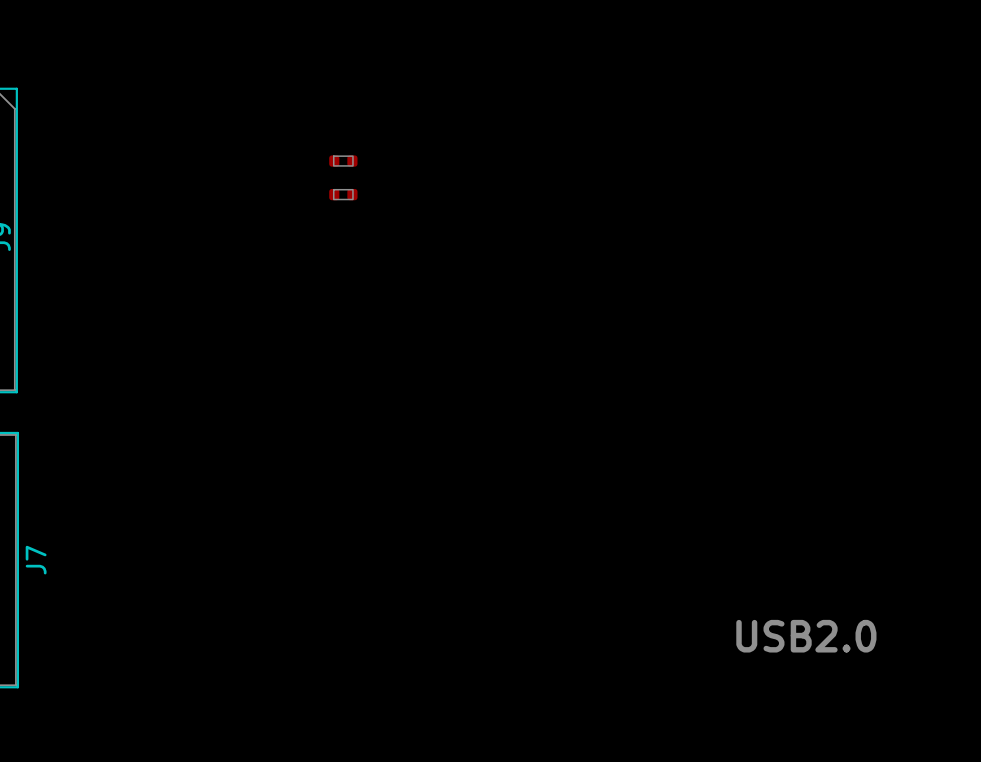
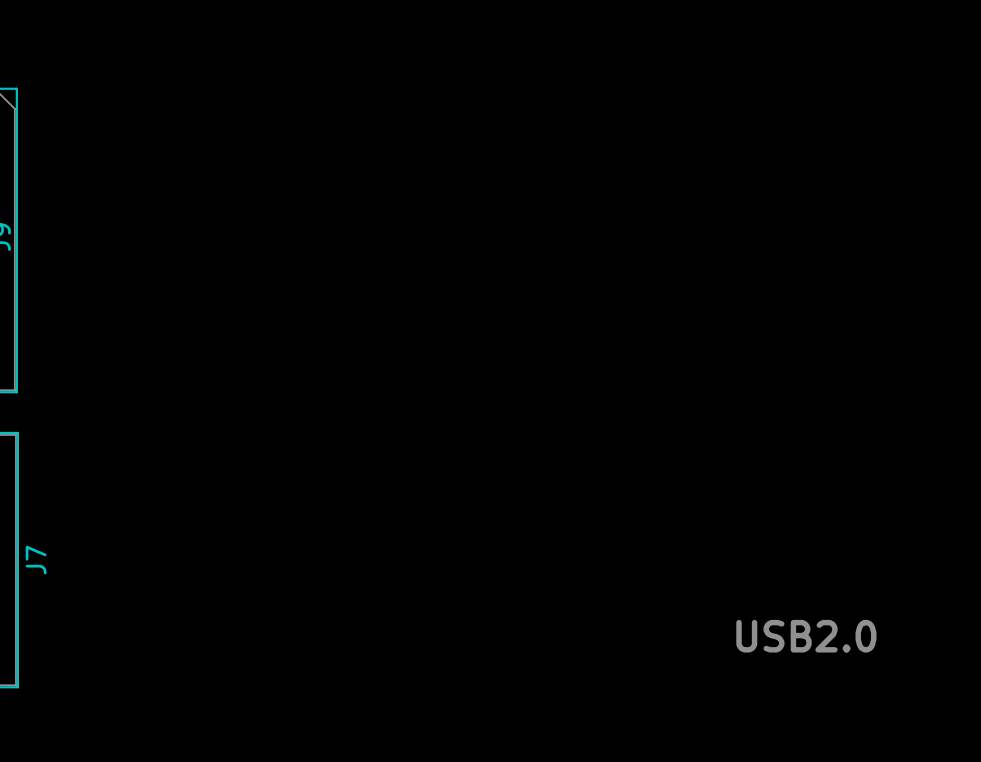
part: (343, 161) -> none
part: (343, 194) -> none

